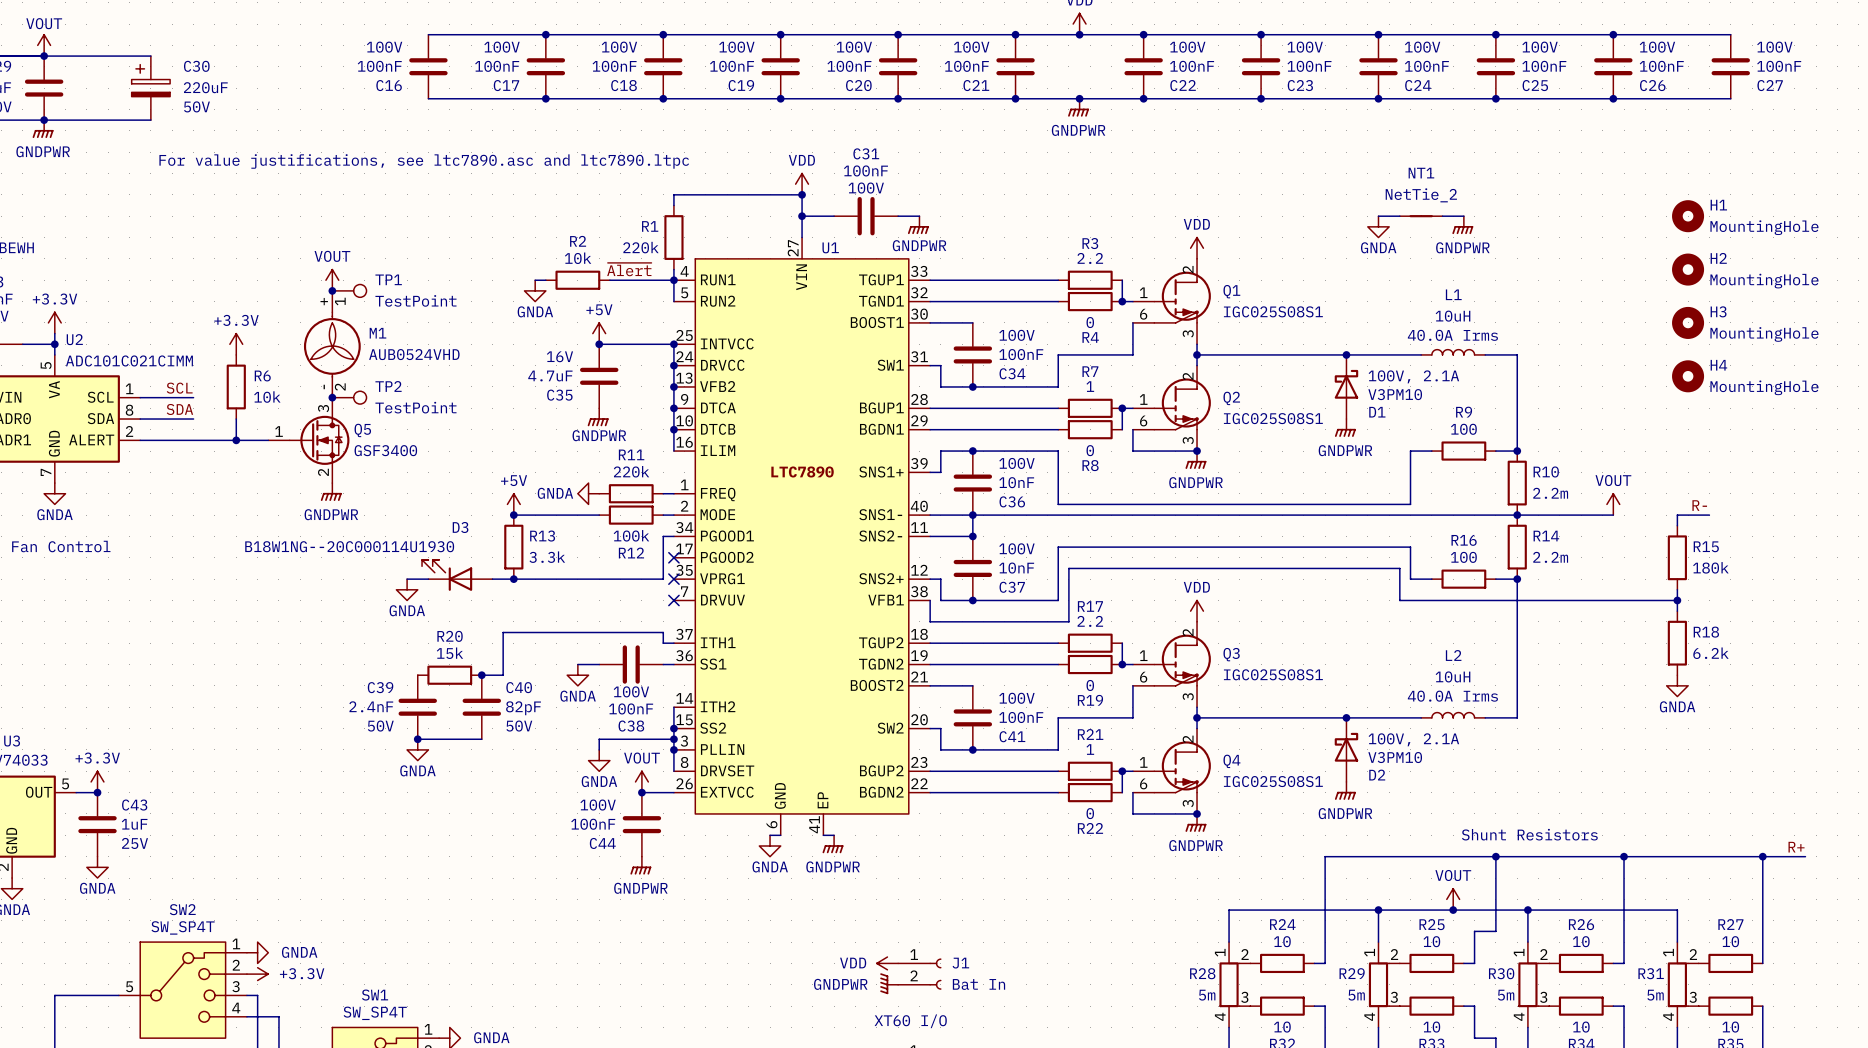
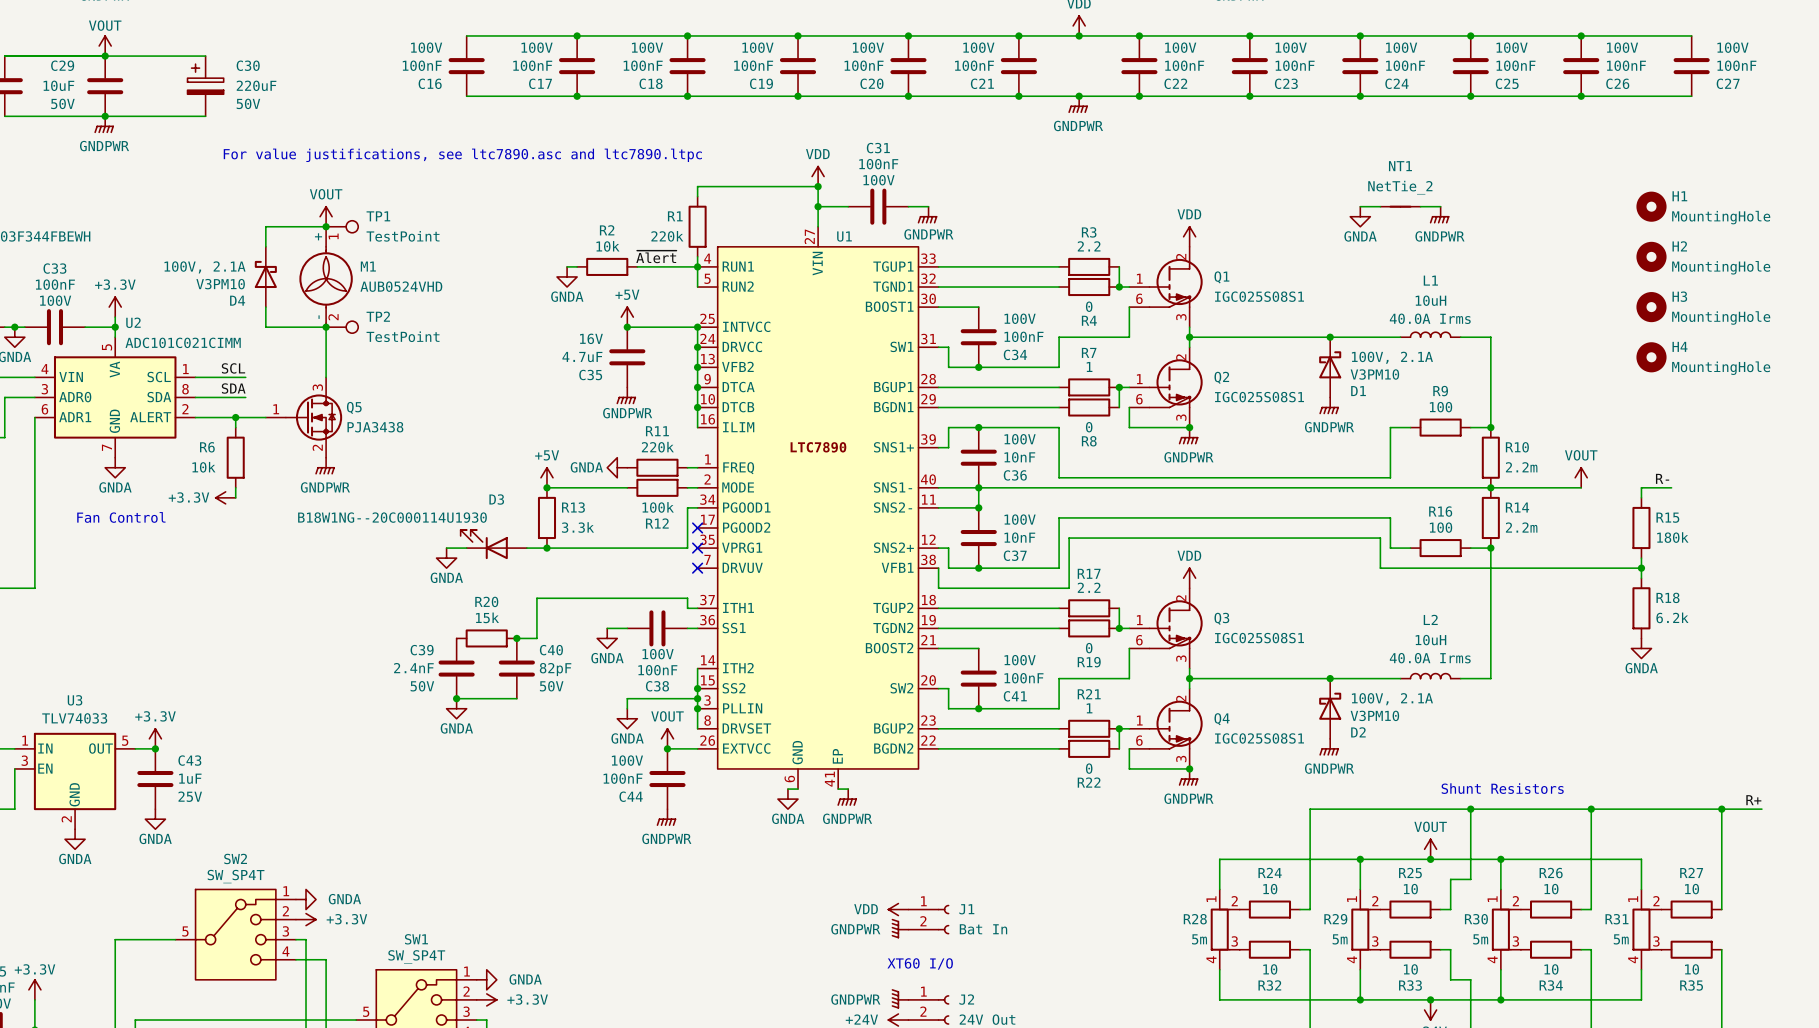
wire: none -> (326, 226) (265, 226) (265, 246)
junction: none -> (326, 226)
power symbol position: VOUT (332, 280) -> VOUT (326, 216)
D4: none -> V3PM10 (265, 276)
junction: (332, 290) -> none
TP1 position: (349, 290) -> (342, 226)
power symbol text position: +3.3V (236, 320) -> +3.3V (188, 497)
wire: none -> (265, 307) (265, 327) (326, 327) (326, 377)
power symbol rotation: 0° (236, 344) -> 90° counterclockwise (225, 497)
power symbol position: +3.3V (236, 344) -> +3.3V (225, 497)
junction: none -> (326, 327)
M1 position: (332, 344) -> (326, 276)
R6 name position: R6 (262, 376) -> R6 (207, 447)
R6 position: (236, 386) -> (235, 457)
R6 value position: 10k (267, 397) -> 10k (203, 467)
junction: (332, 397) -> none
TP2 position: (349, 397) -> (342, 327)
wire: (236, 419) (236, 440) -> none
wire: none -> (235, 417) (235, 427)
junction: none -> (235, 417)
junction: (236, 440) -> none
Q5 position: (308, 440) -> (304, 417)
Q5 value: GSF3400 (385, 450) -> PJA3438 (375, 427)
power symbol position: GNDPWR (331, 492) -> GNDPWR (325, 466)
wire: none -> (235, 487) (235, 497)

